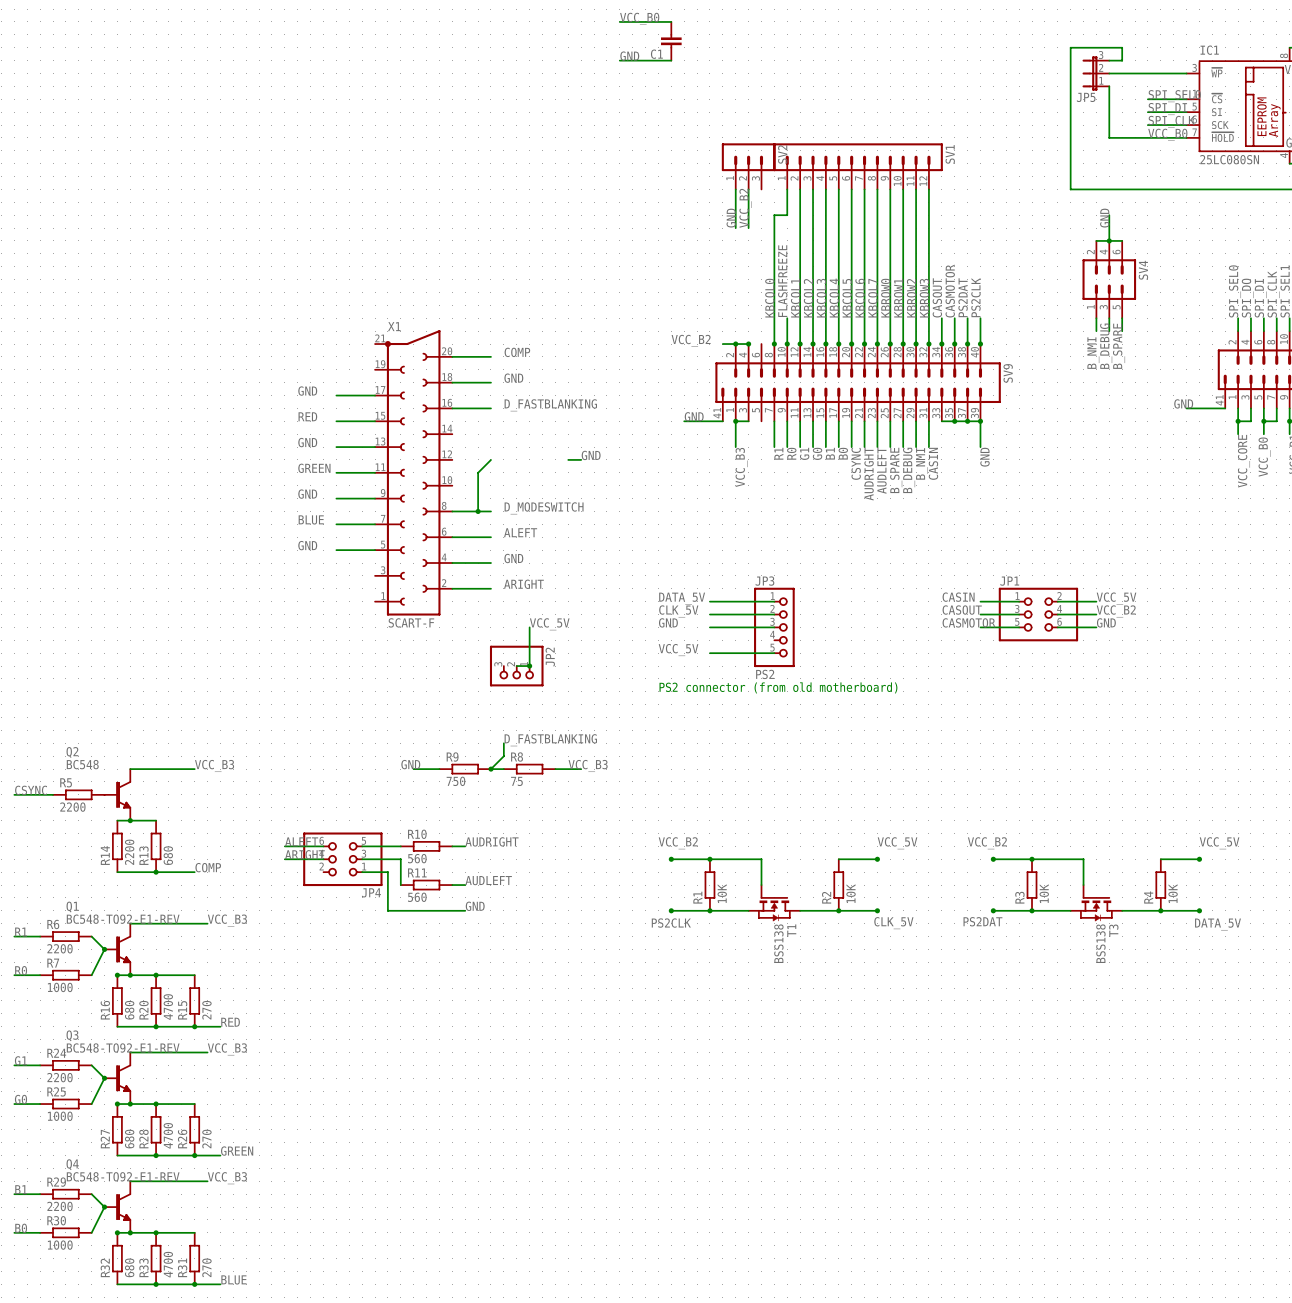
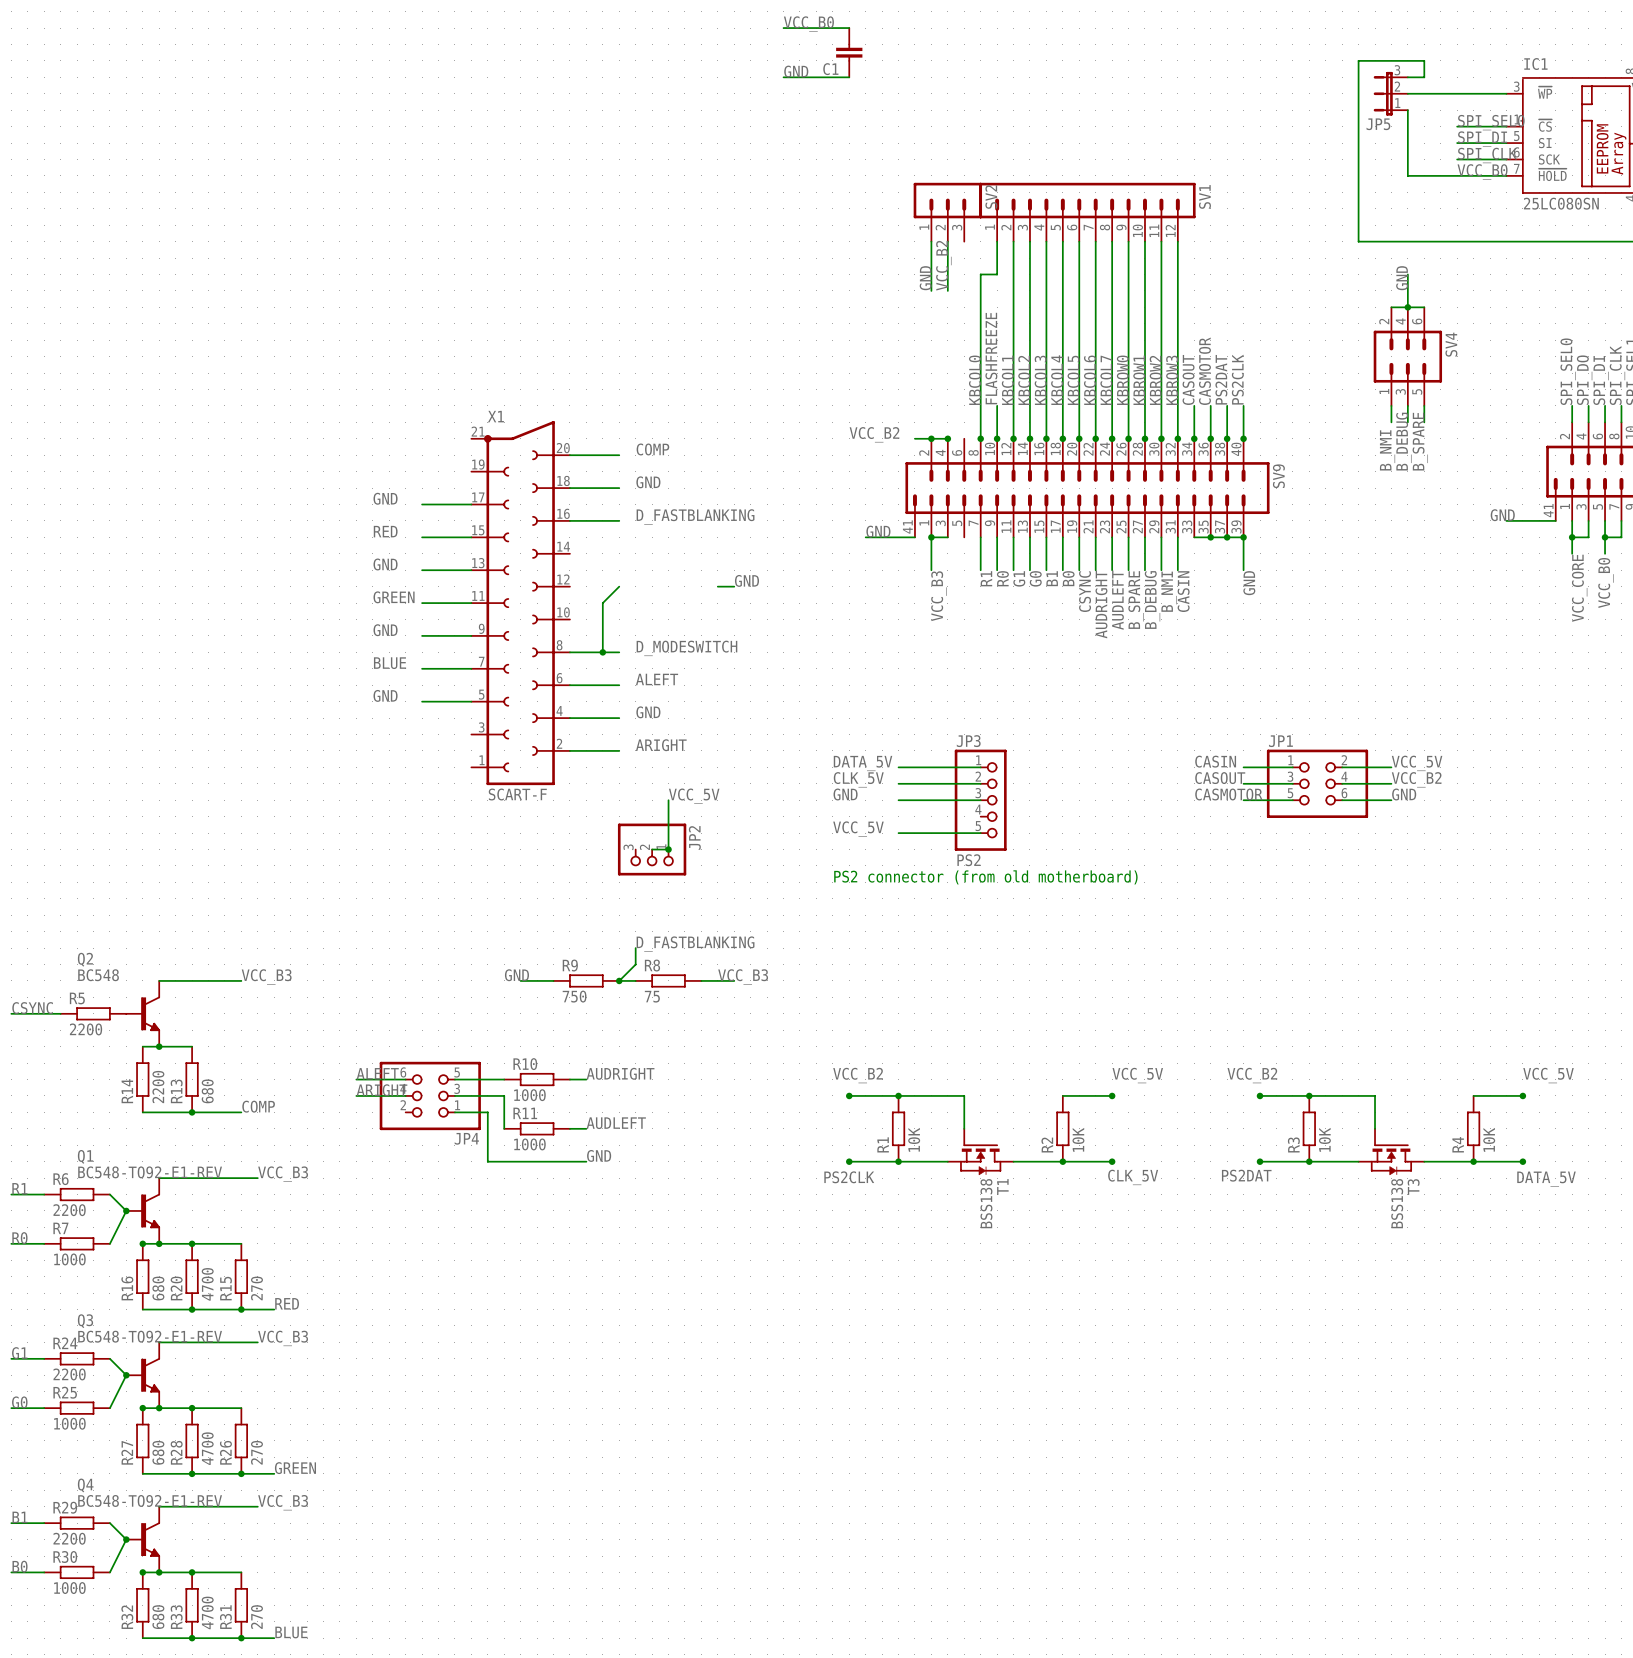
R10 value: 560 (417, 858) -> 1000 (529, 1095)
R11 value: 560 (417, 897) -> 1000 (529, 1144)

